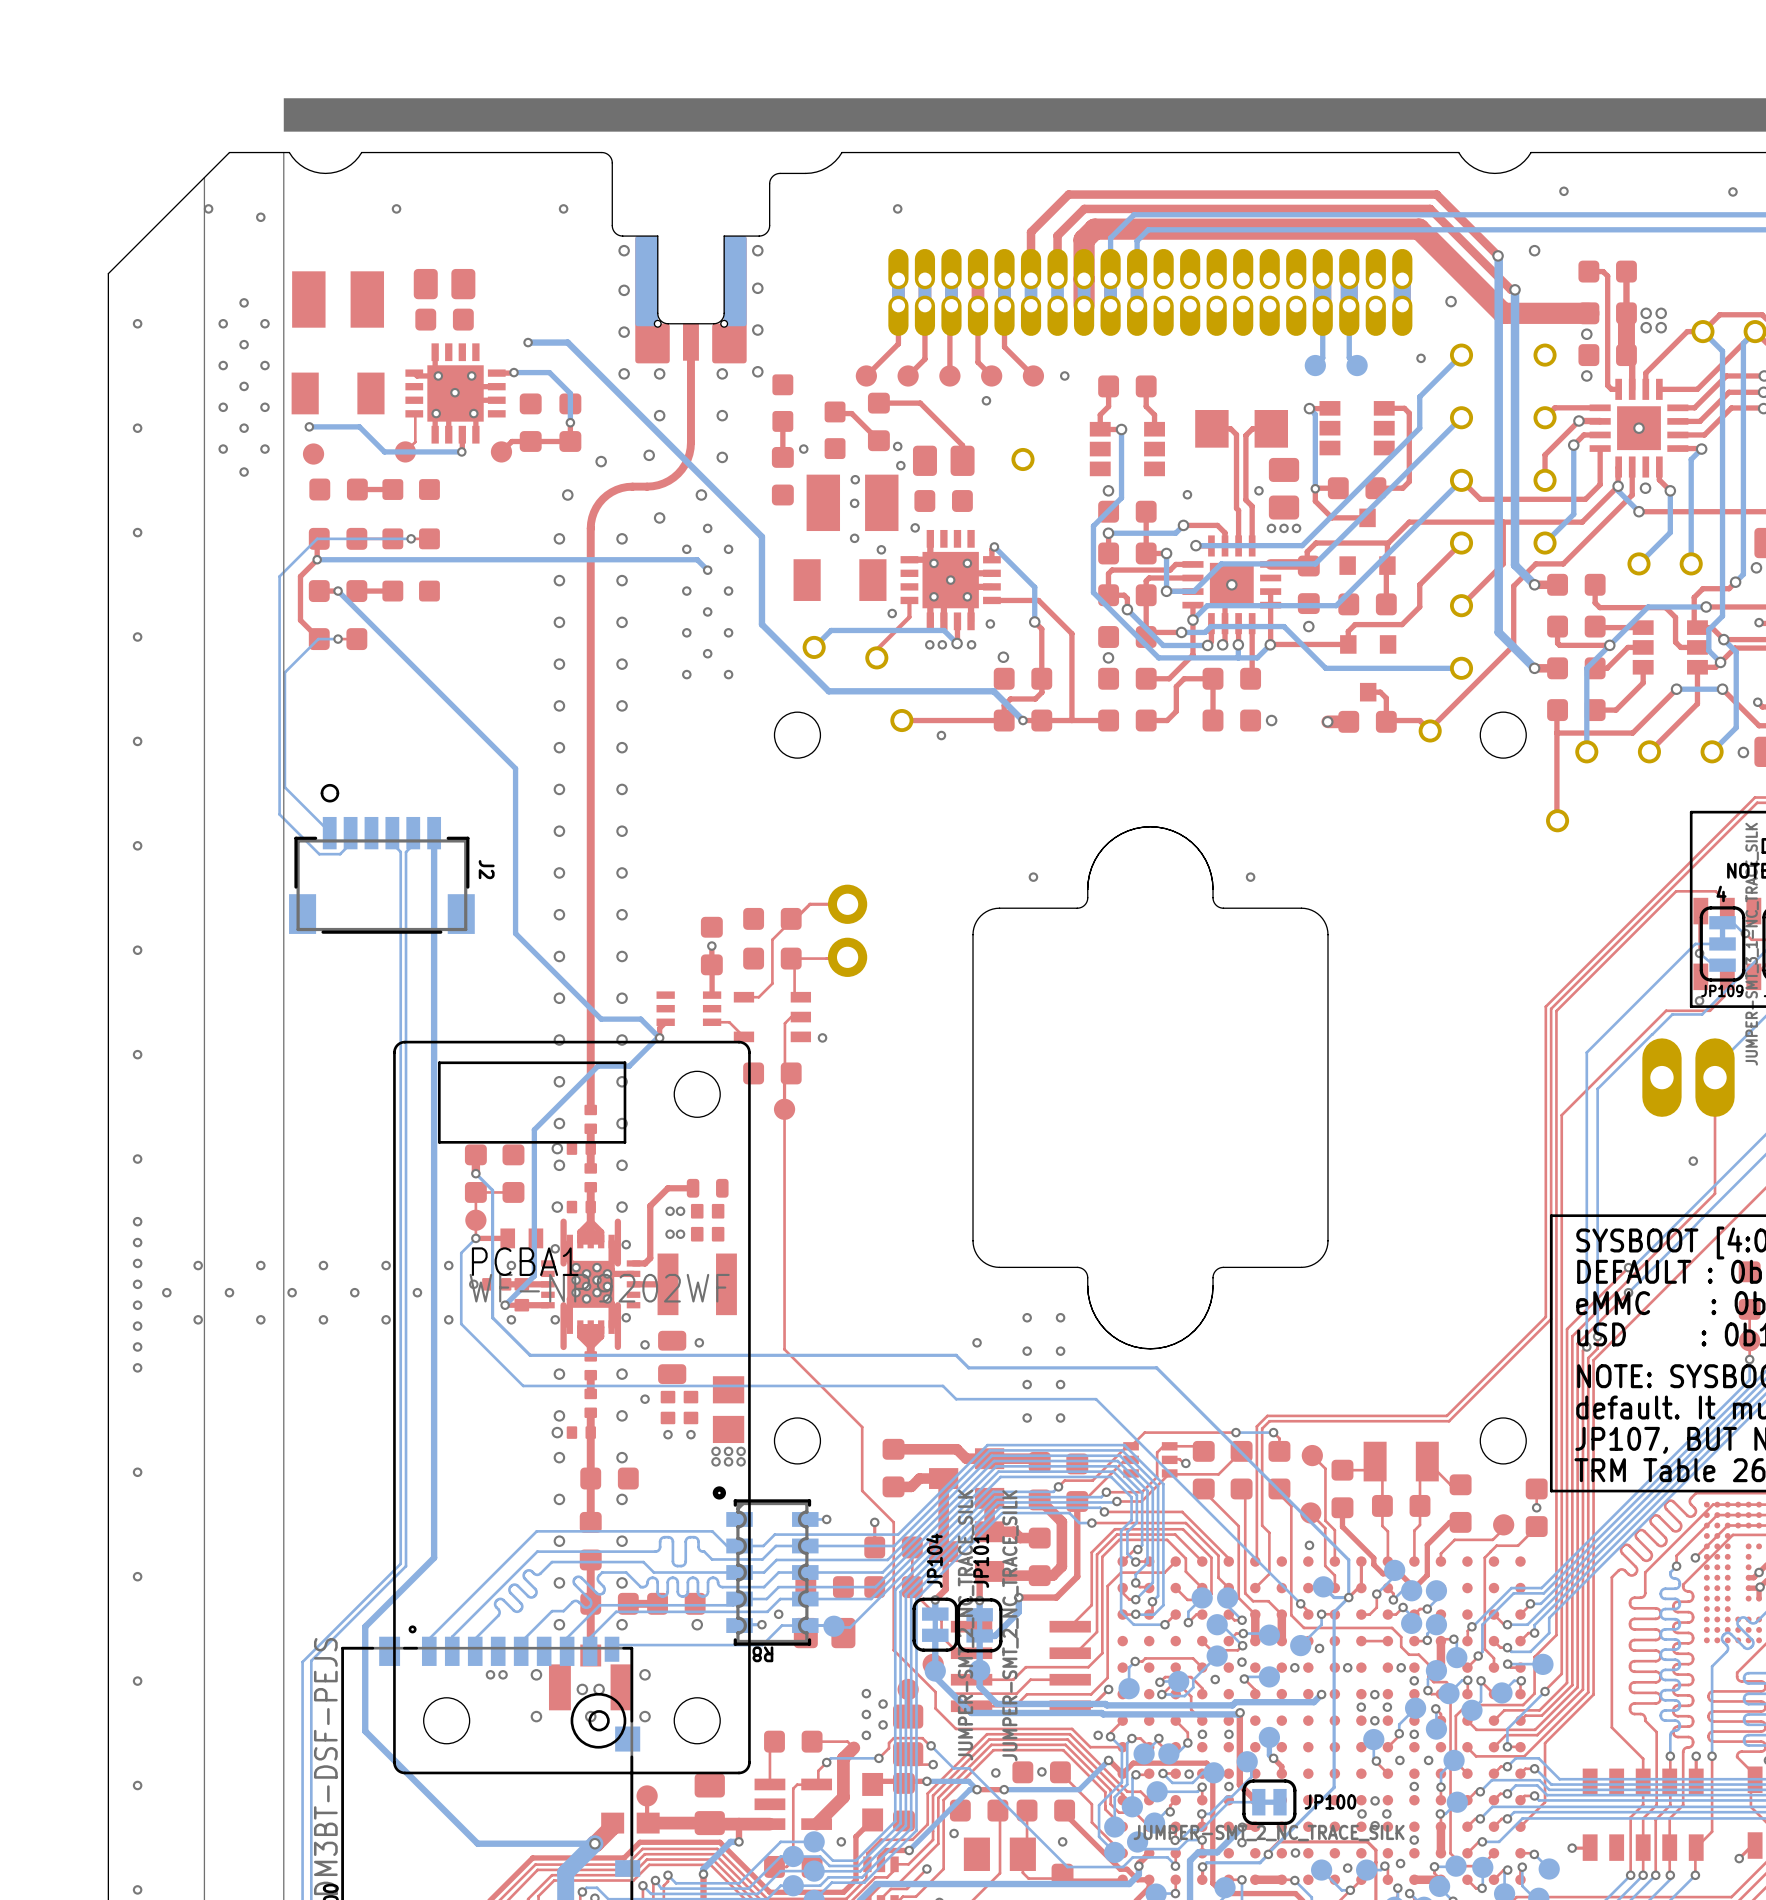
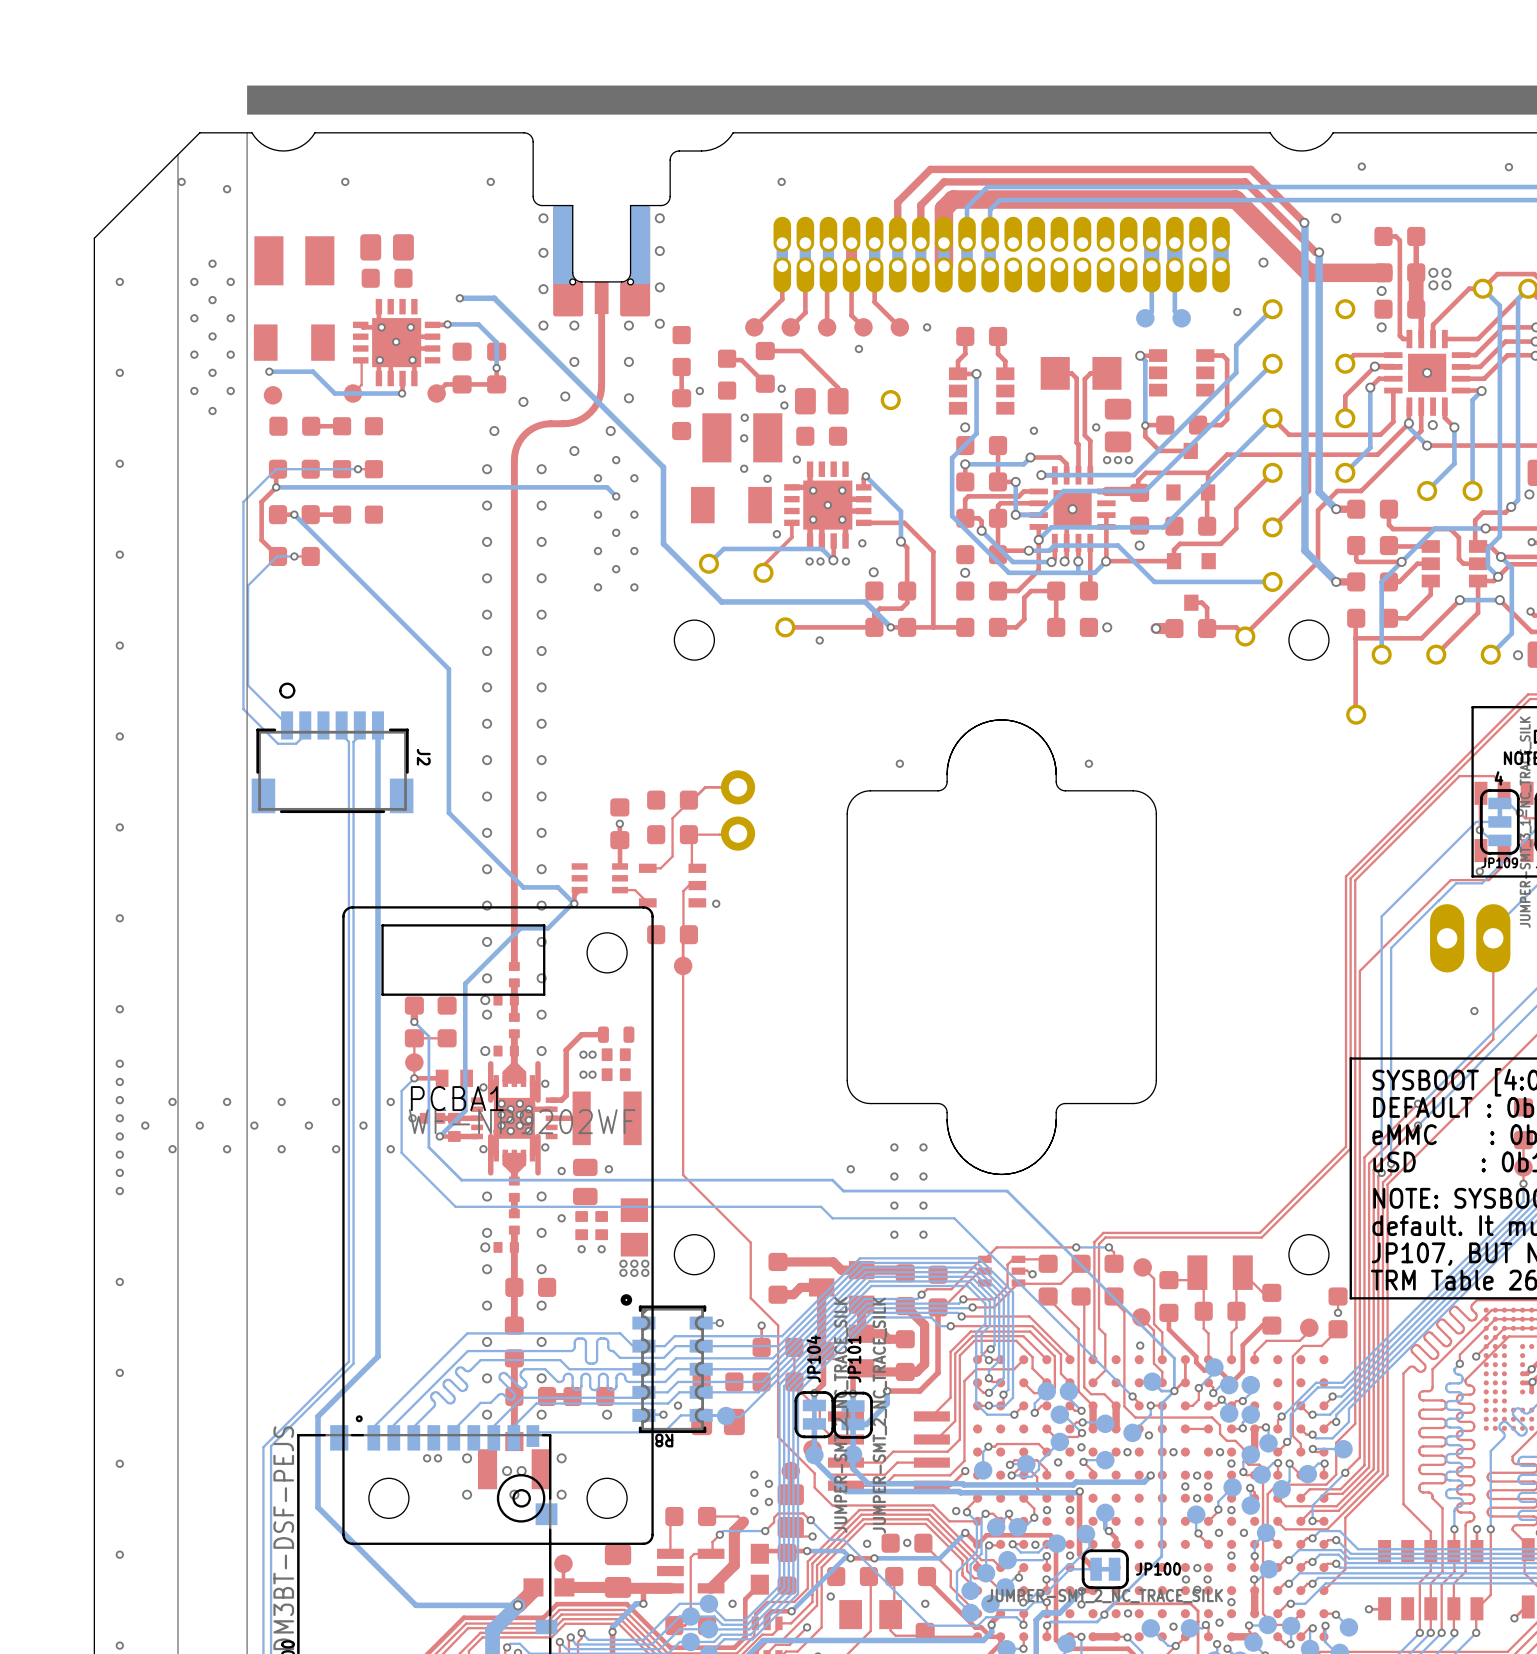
via: (511, 1265) -> none
via: (511, 1319) -> none

